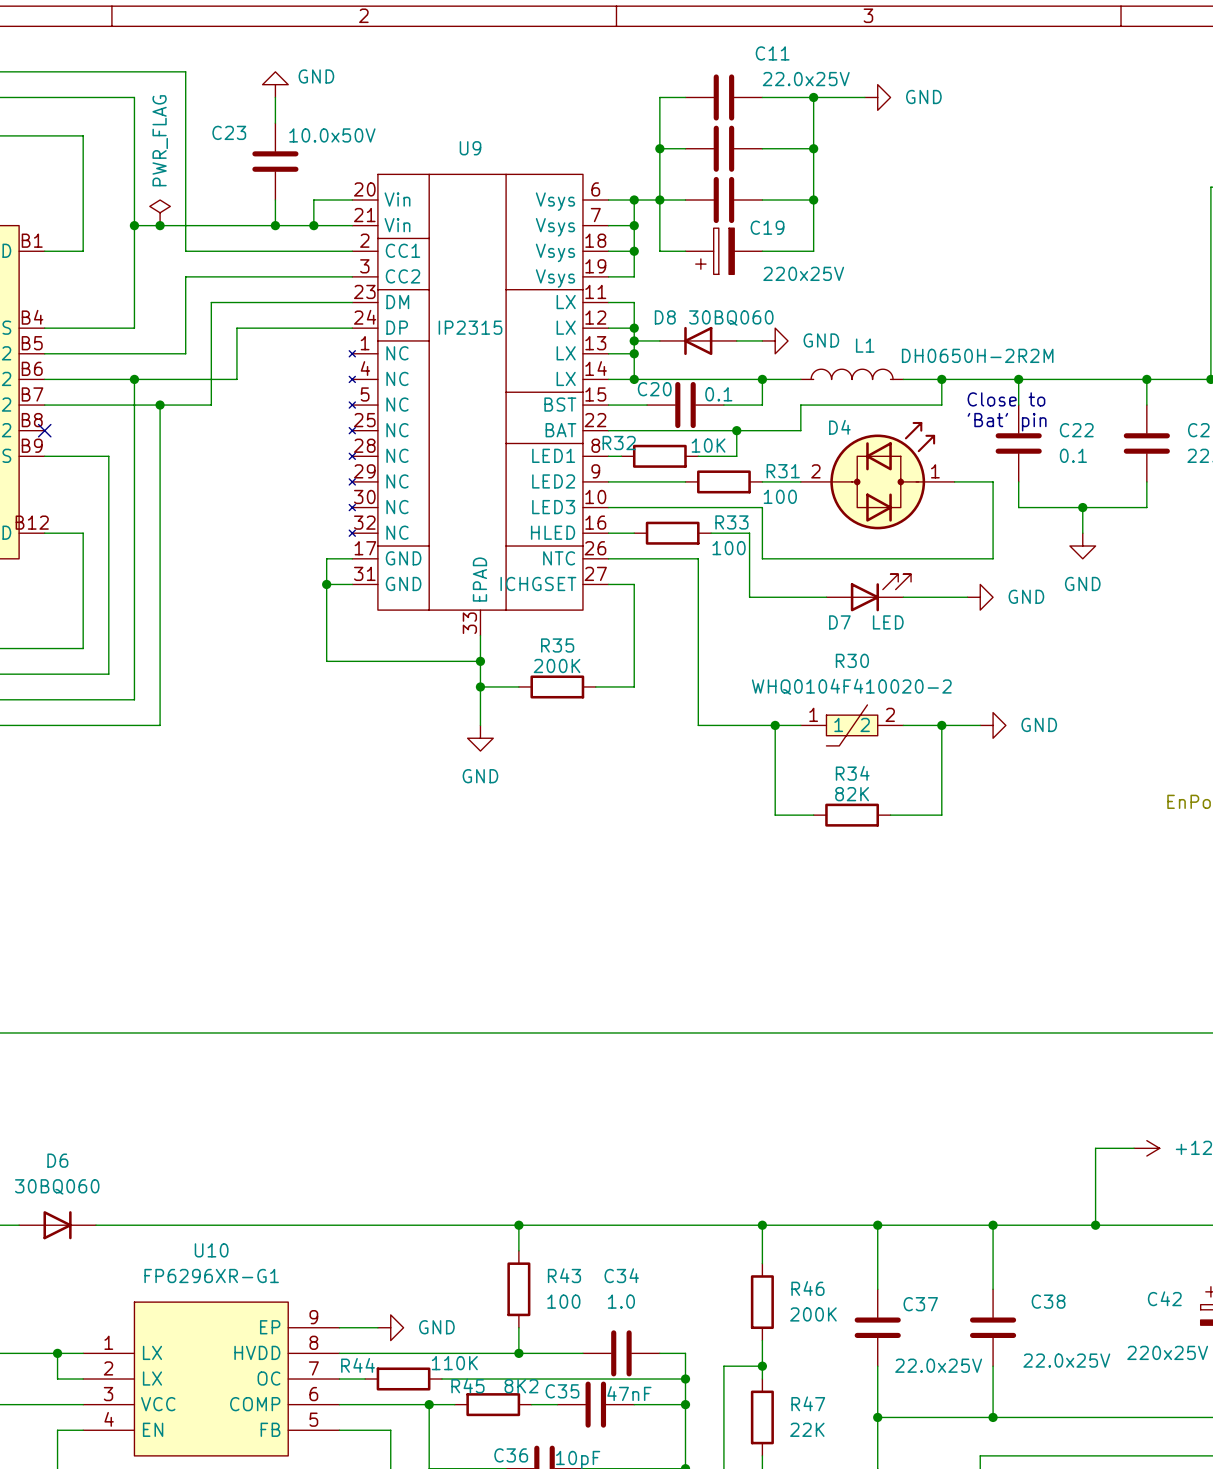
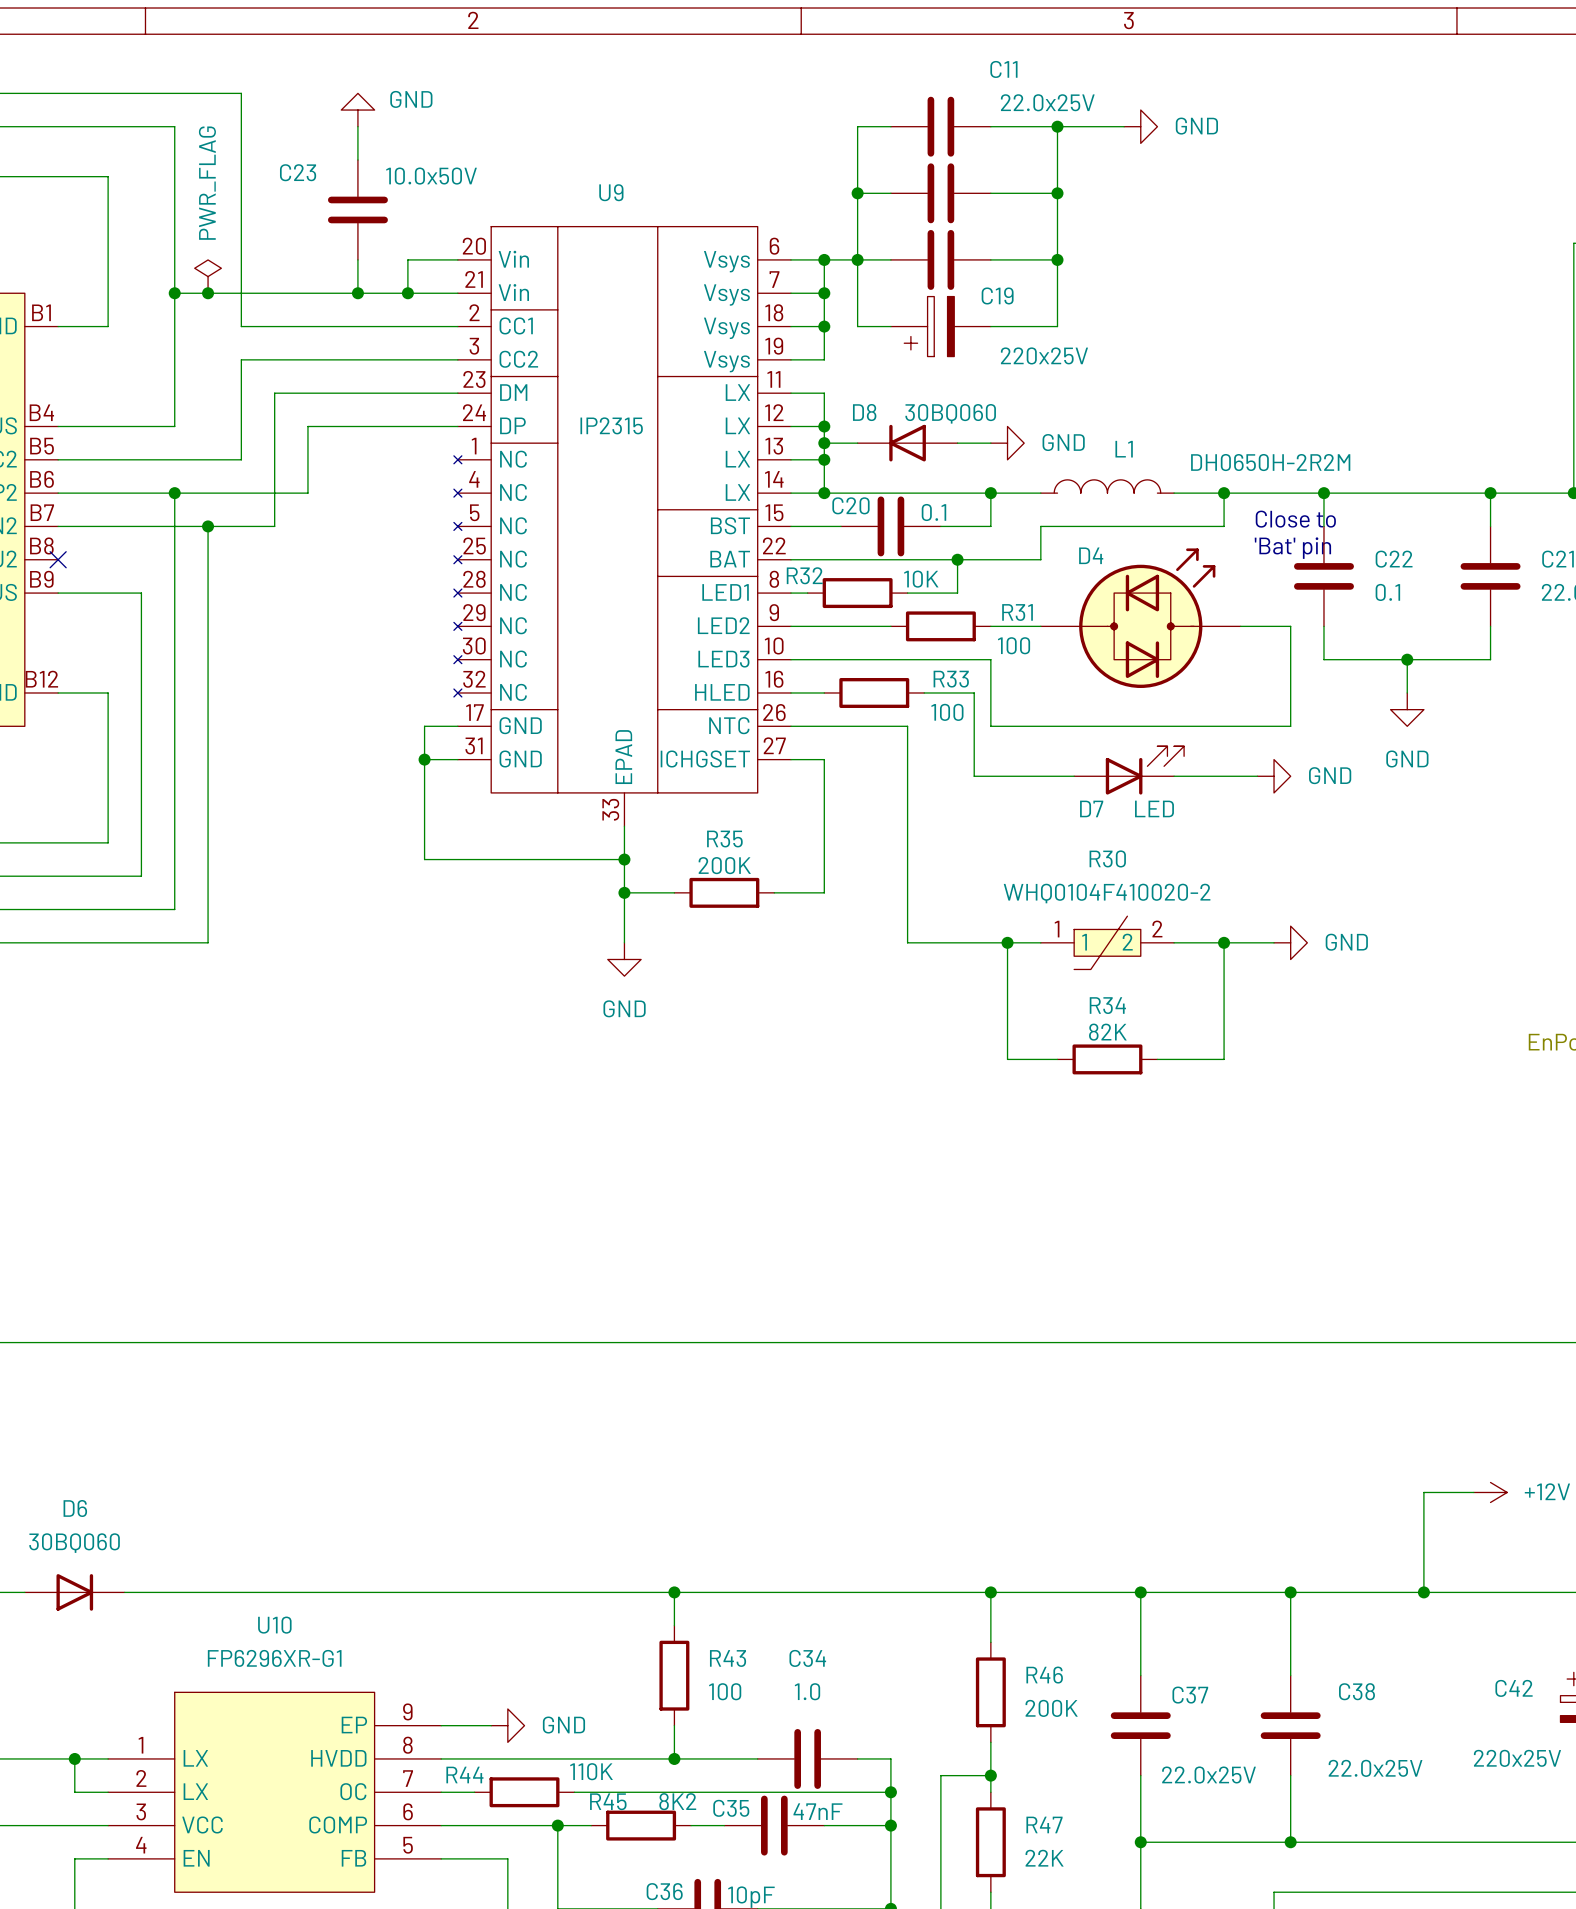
D4 pin number: 2 (815, 471) -> none
D4 pin number: 1 (935, 471) -> none

